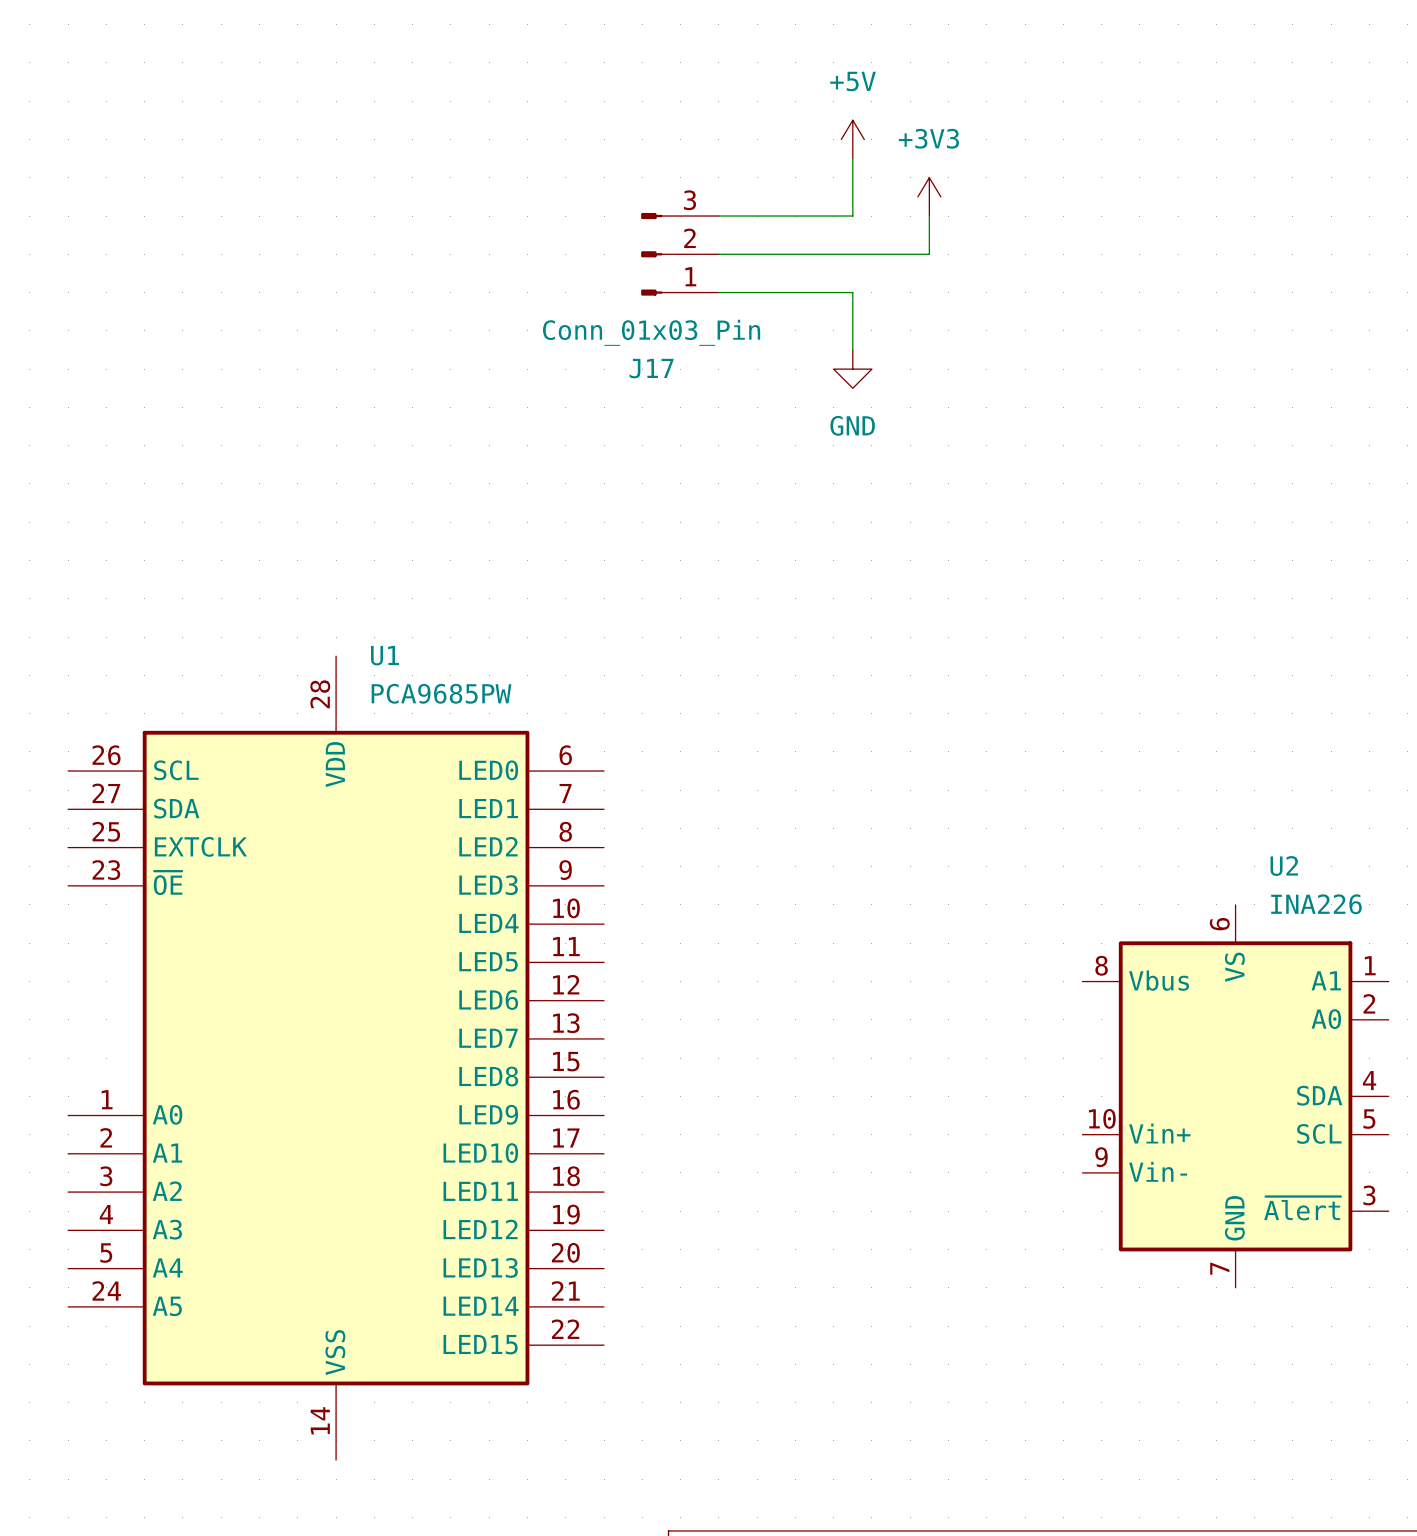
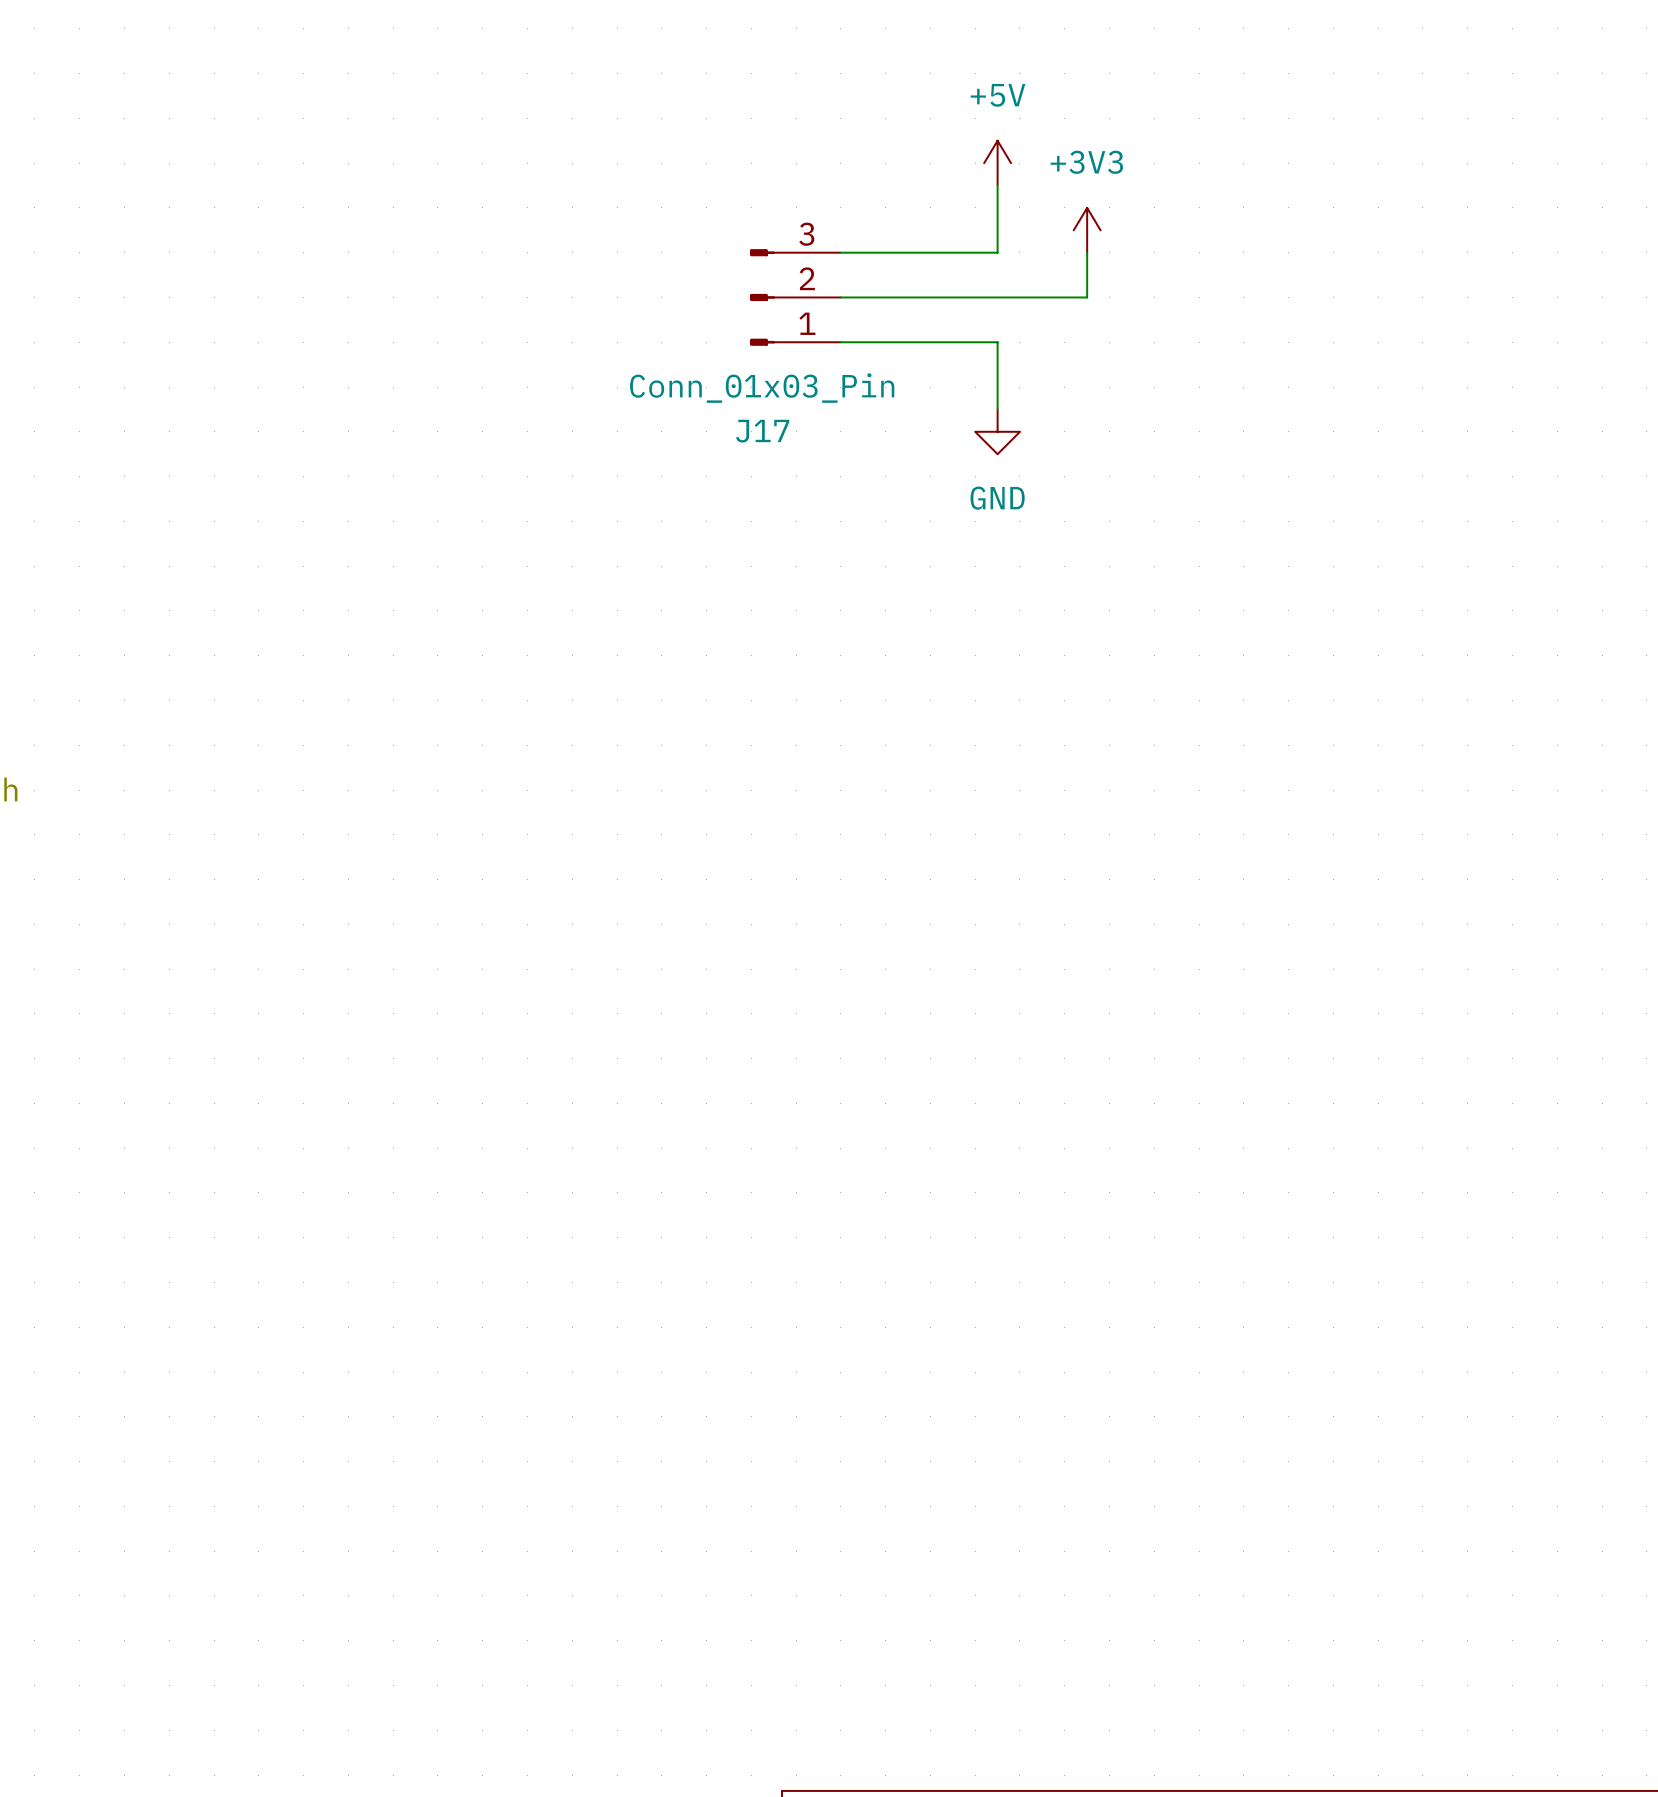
U1: PCA9685PW (336, 1058) -> none
U2: INA226 (1235, 1096) -> none

